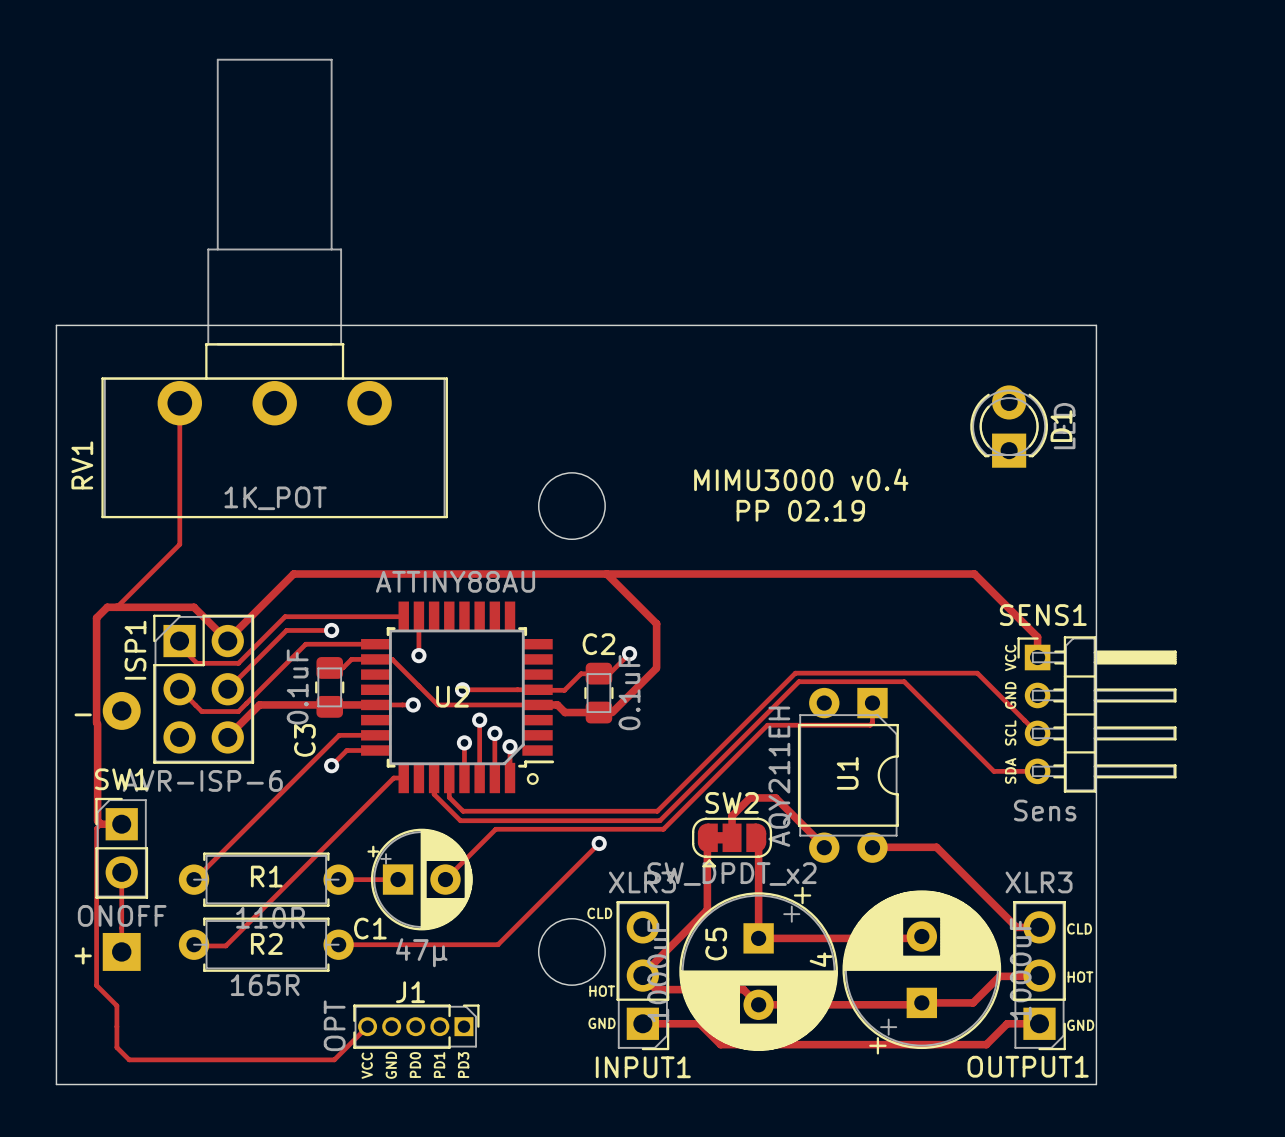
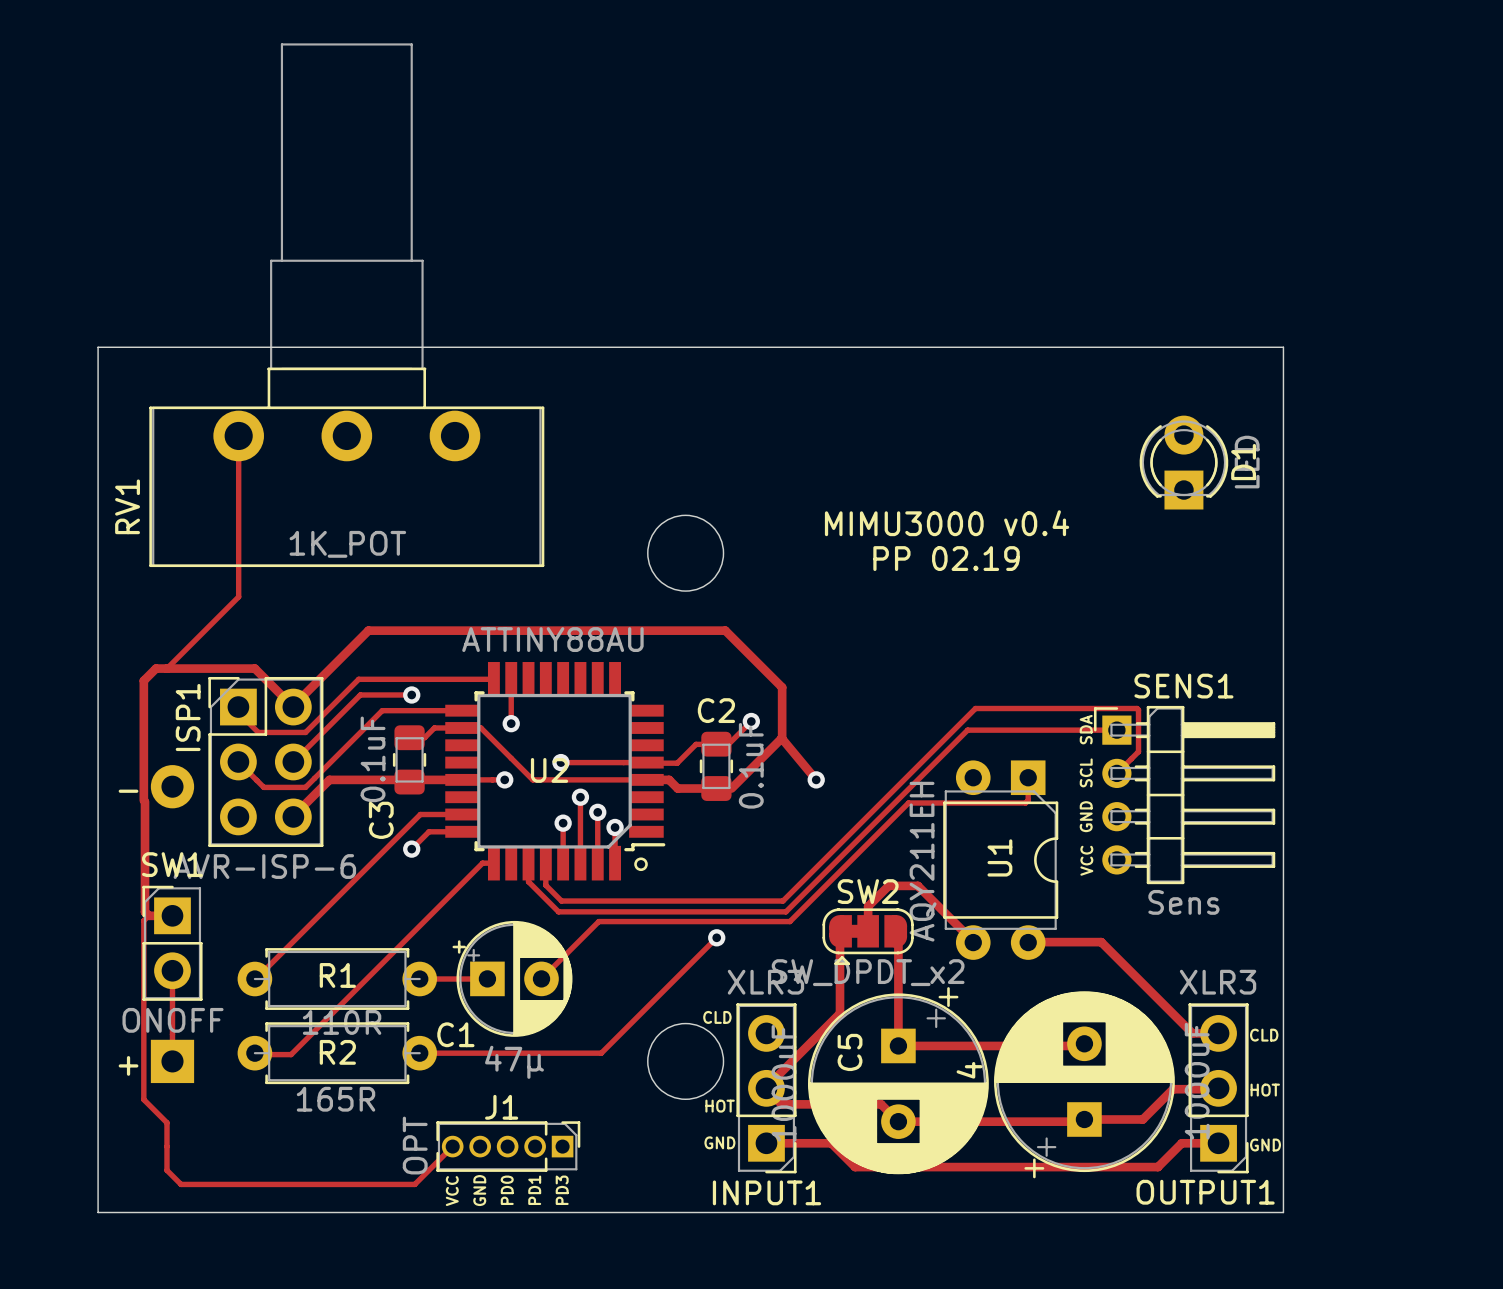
track: (606, 574) (974, 574) (1037, 637) (1037, 657) -> none
SENS1 name position: SENS1 (1043, 615) -> SENS1 (1183, 686)
text position: VCC (1010, 657) -> VCC (1086, 860)
track: none -> (781, 738) (816, 779)
track: (795, 673) (977, 673) (1037, 733) -> (940, 743) (975, 708) (1137, 708) (1138, 751) (1116, 773)
track: (798, 681) (904, 681) (993, 771) (1037, 771) -> (944, 753) (967, 730) (1116, 730)
text position: GND (1010, 695) -> GND (1086, 816)
via: none -> (816, 779)
SENS1 position: (1096, 714) -> (1184, 795)
text position: SCL (1010, 732) -> SCL (1086, 772)
text position: SDA (1010, 770) -> SDA (1086, 729)
SENS1 value position: Sens (1045, 810) -> Sens (1183, 902)

